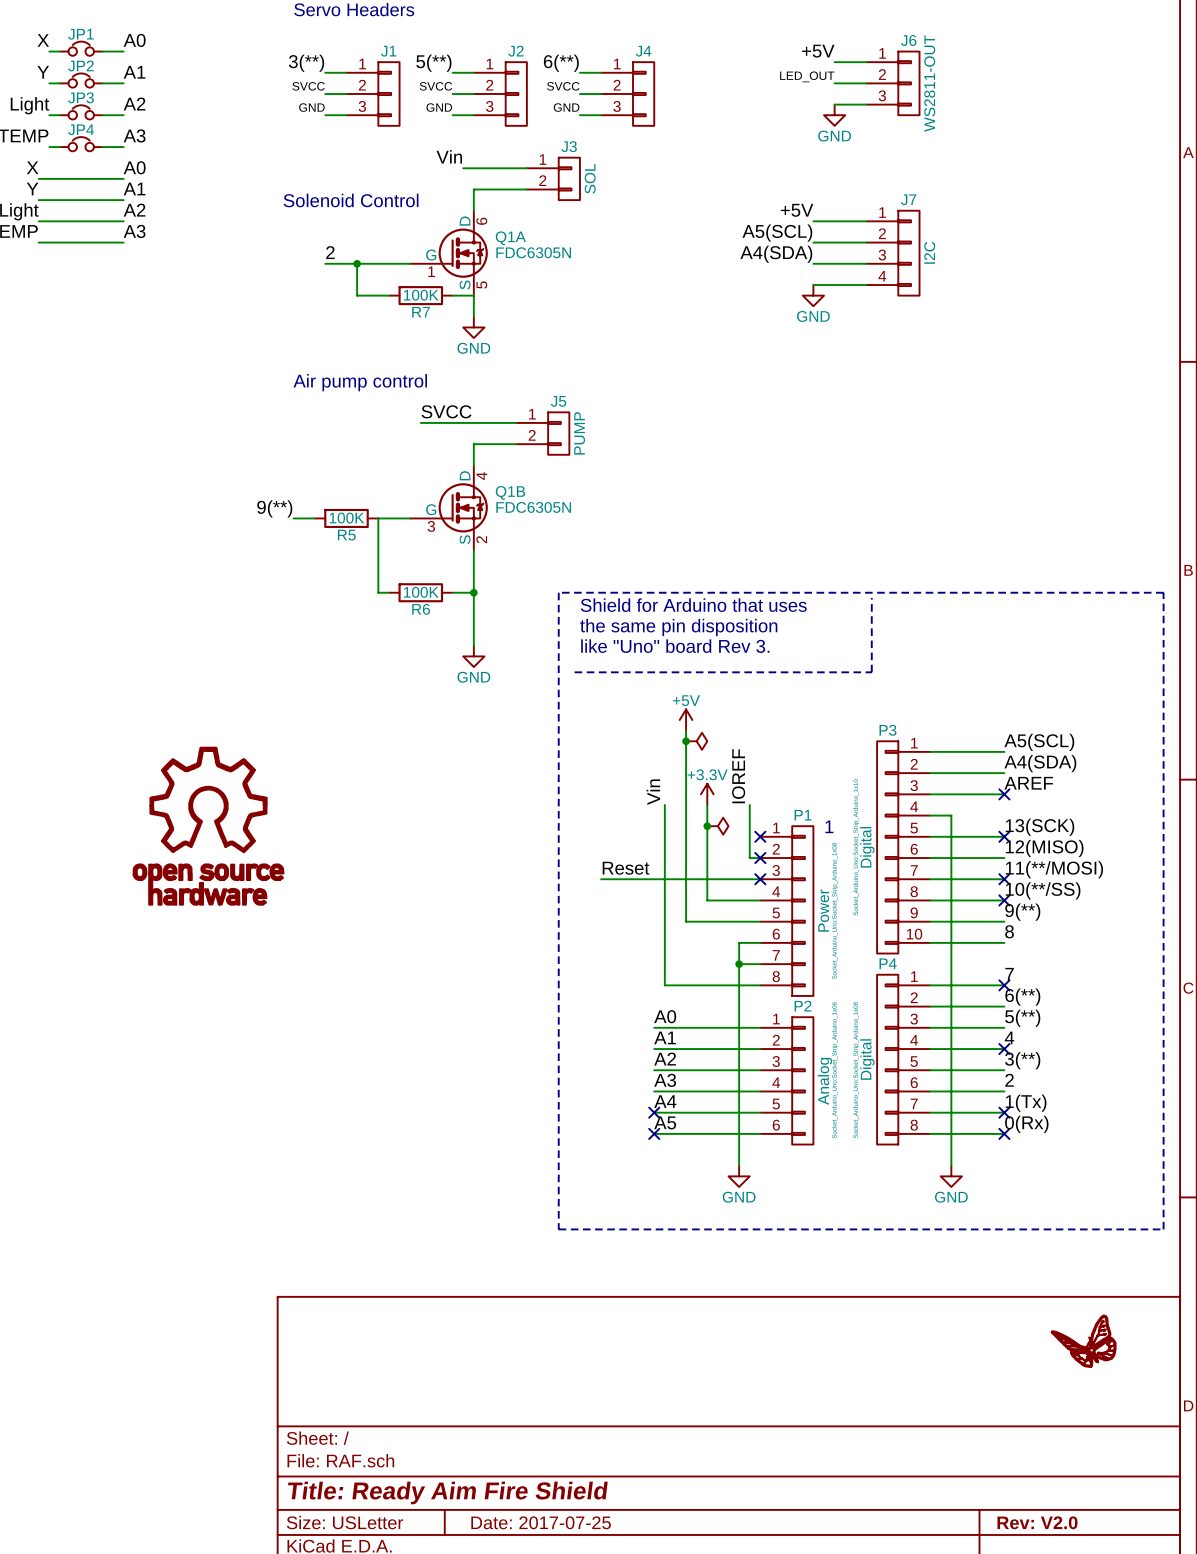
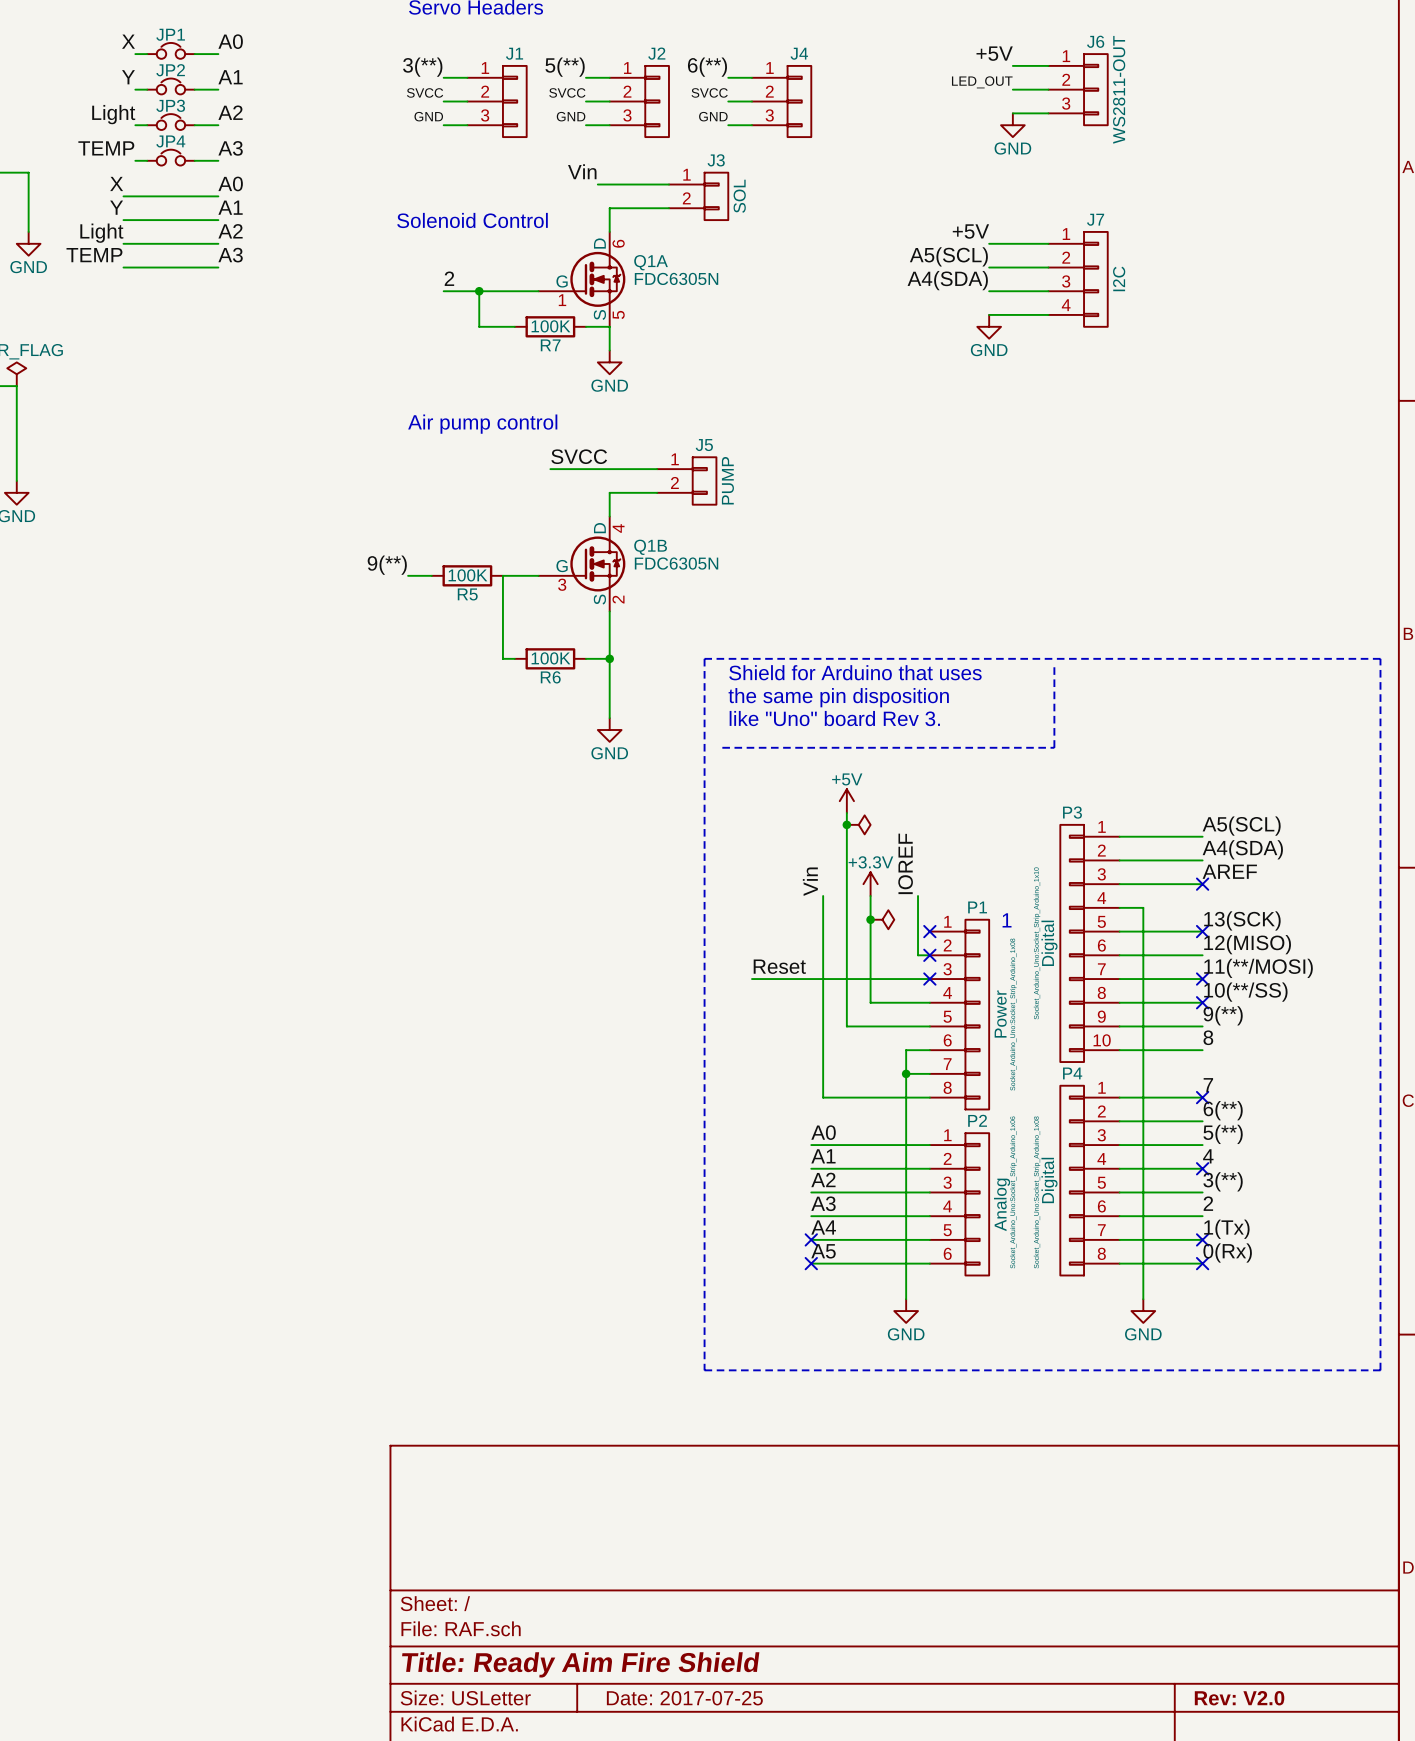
part: (208, 826) -> none
part: (1083, 1341) -> none

